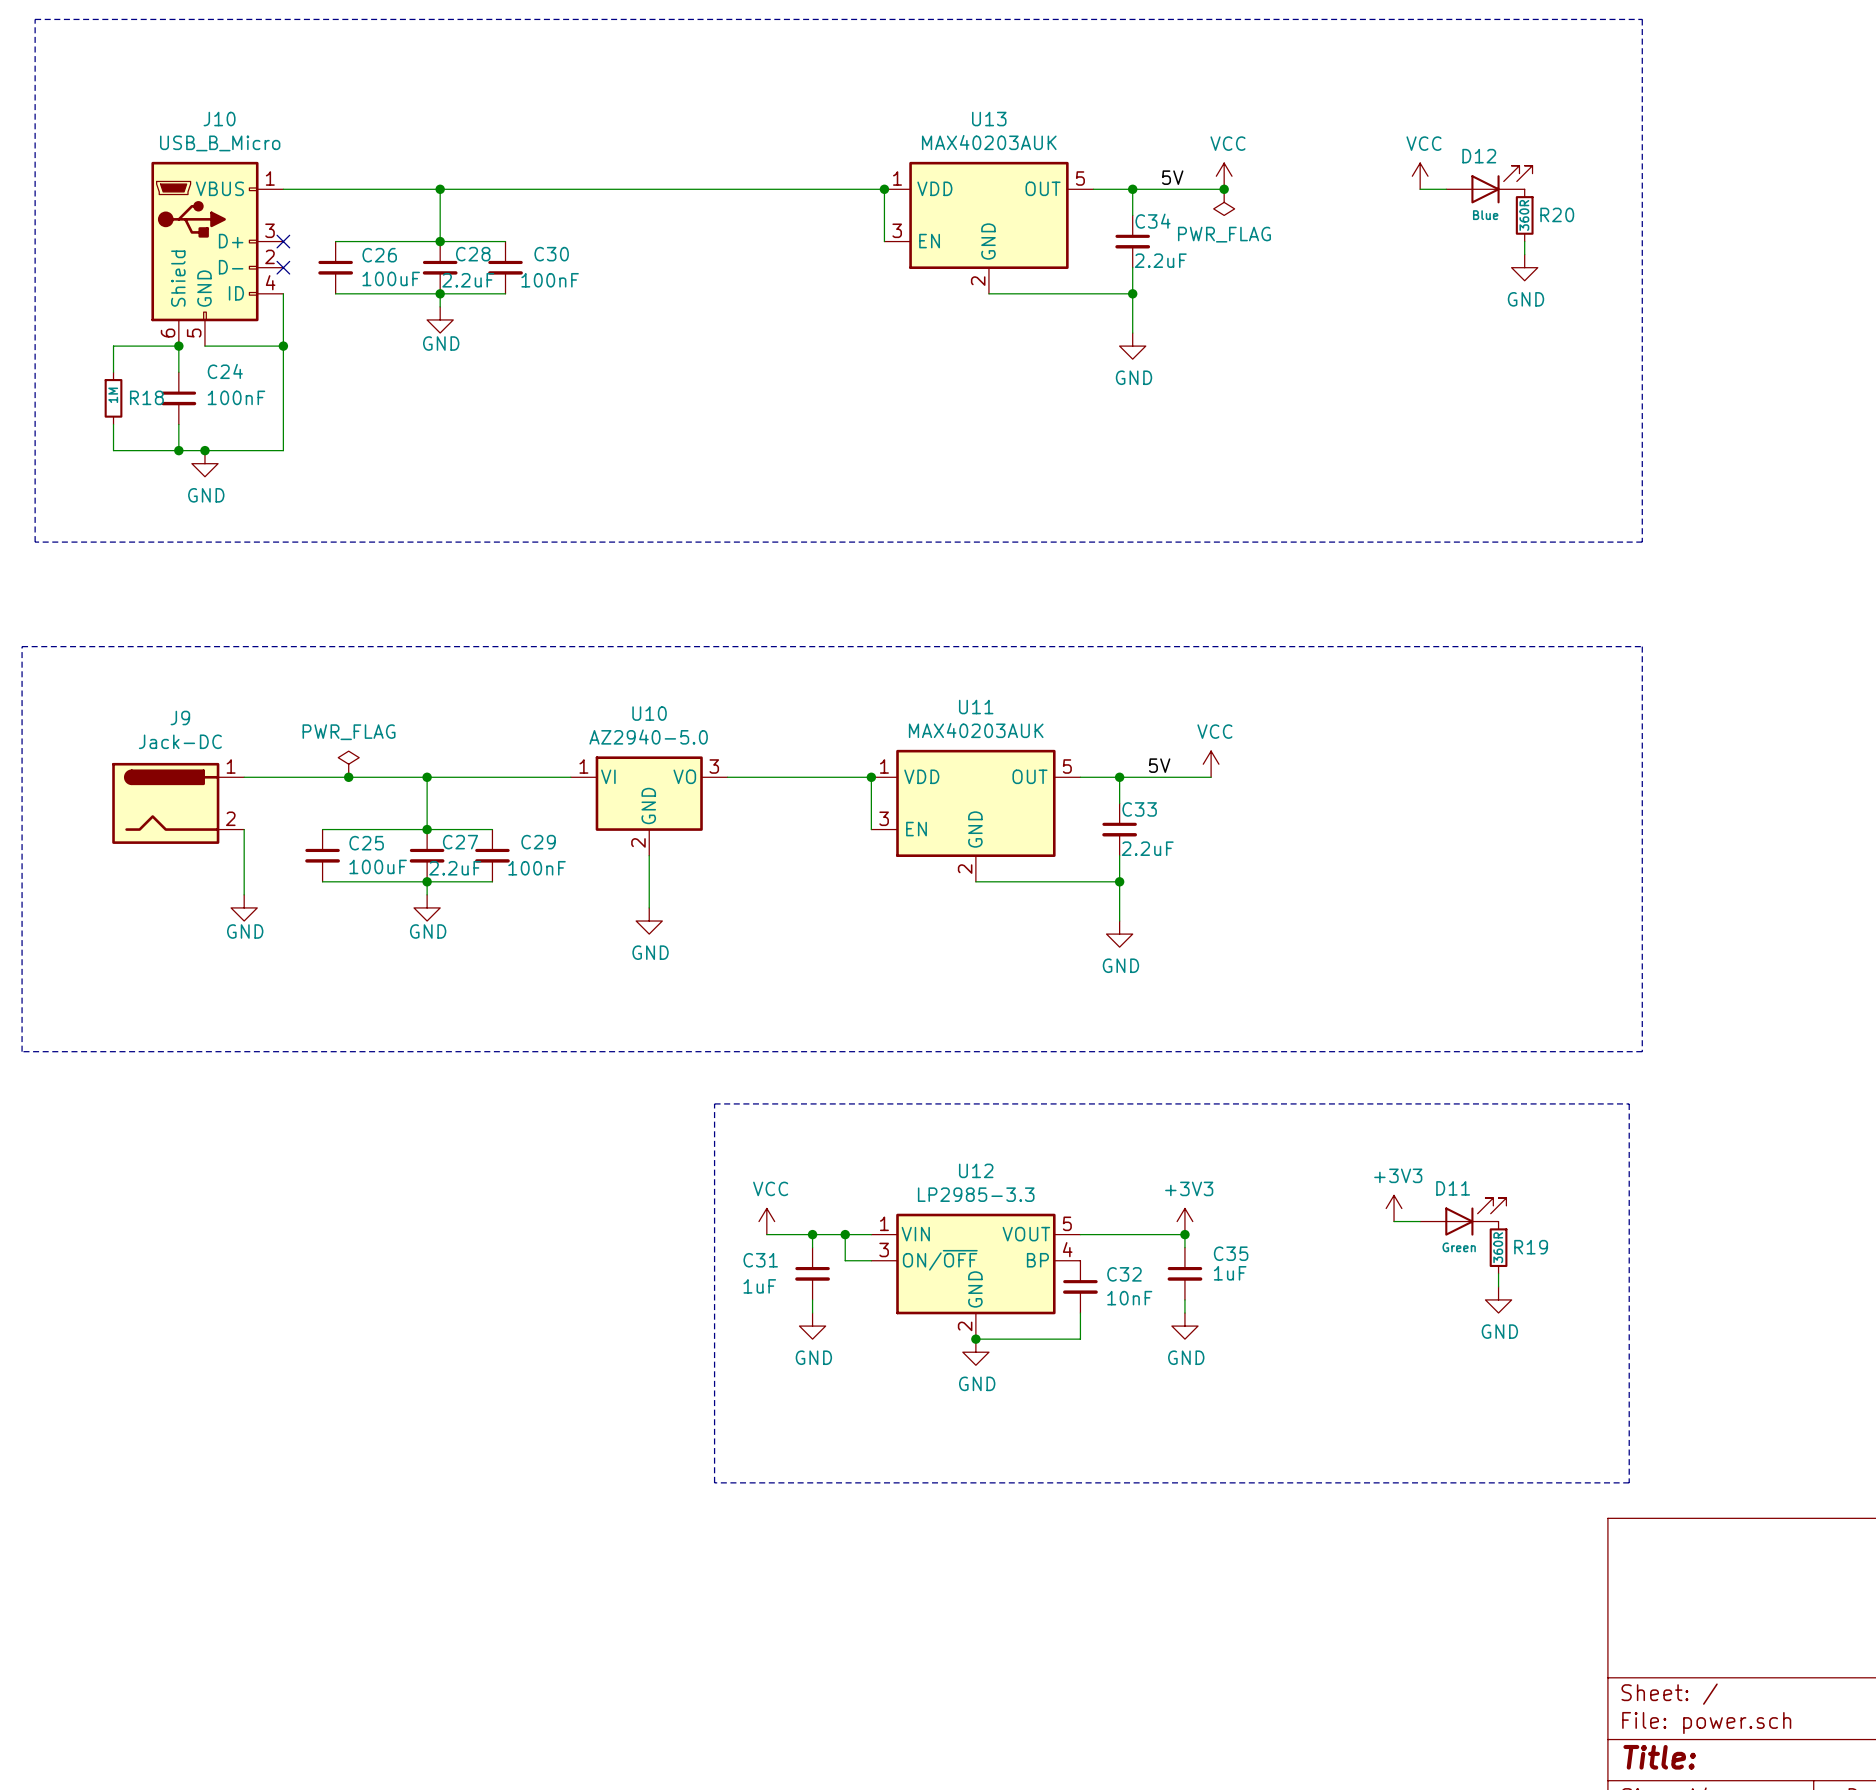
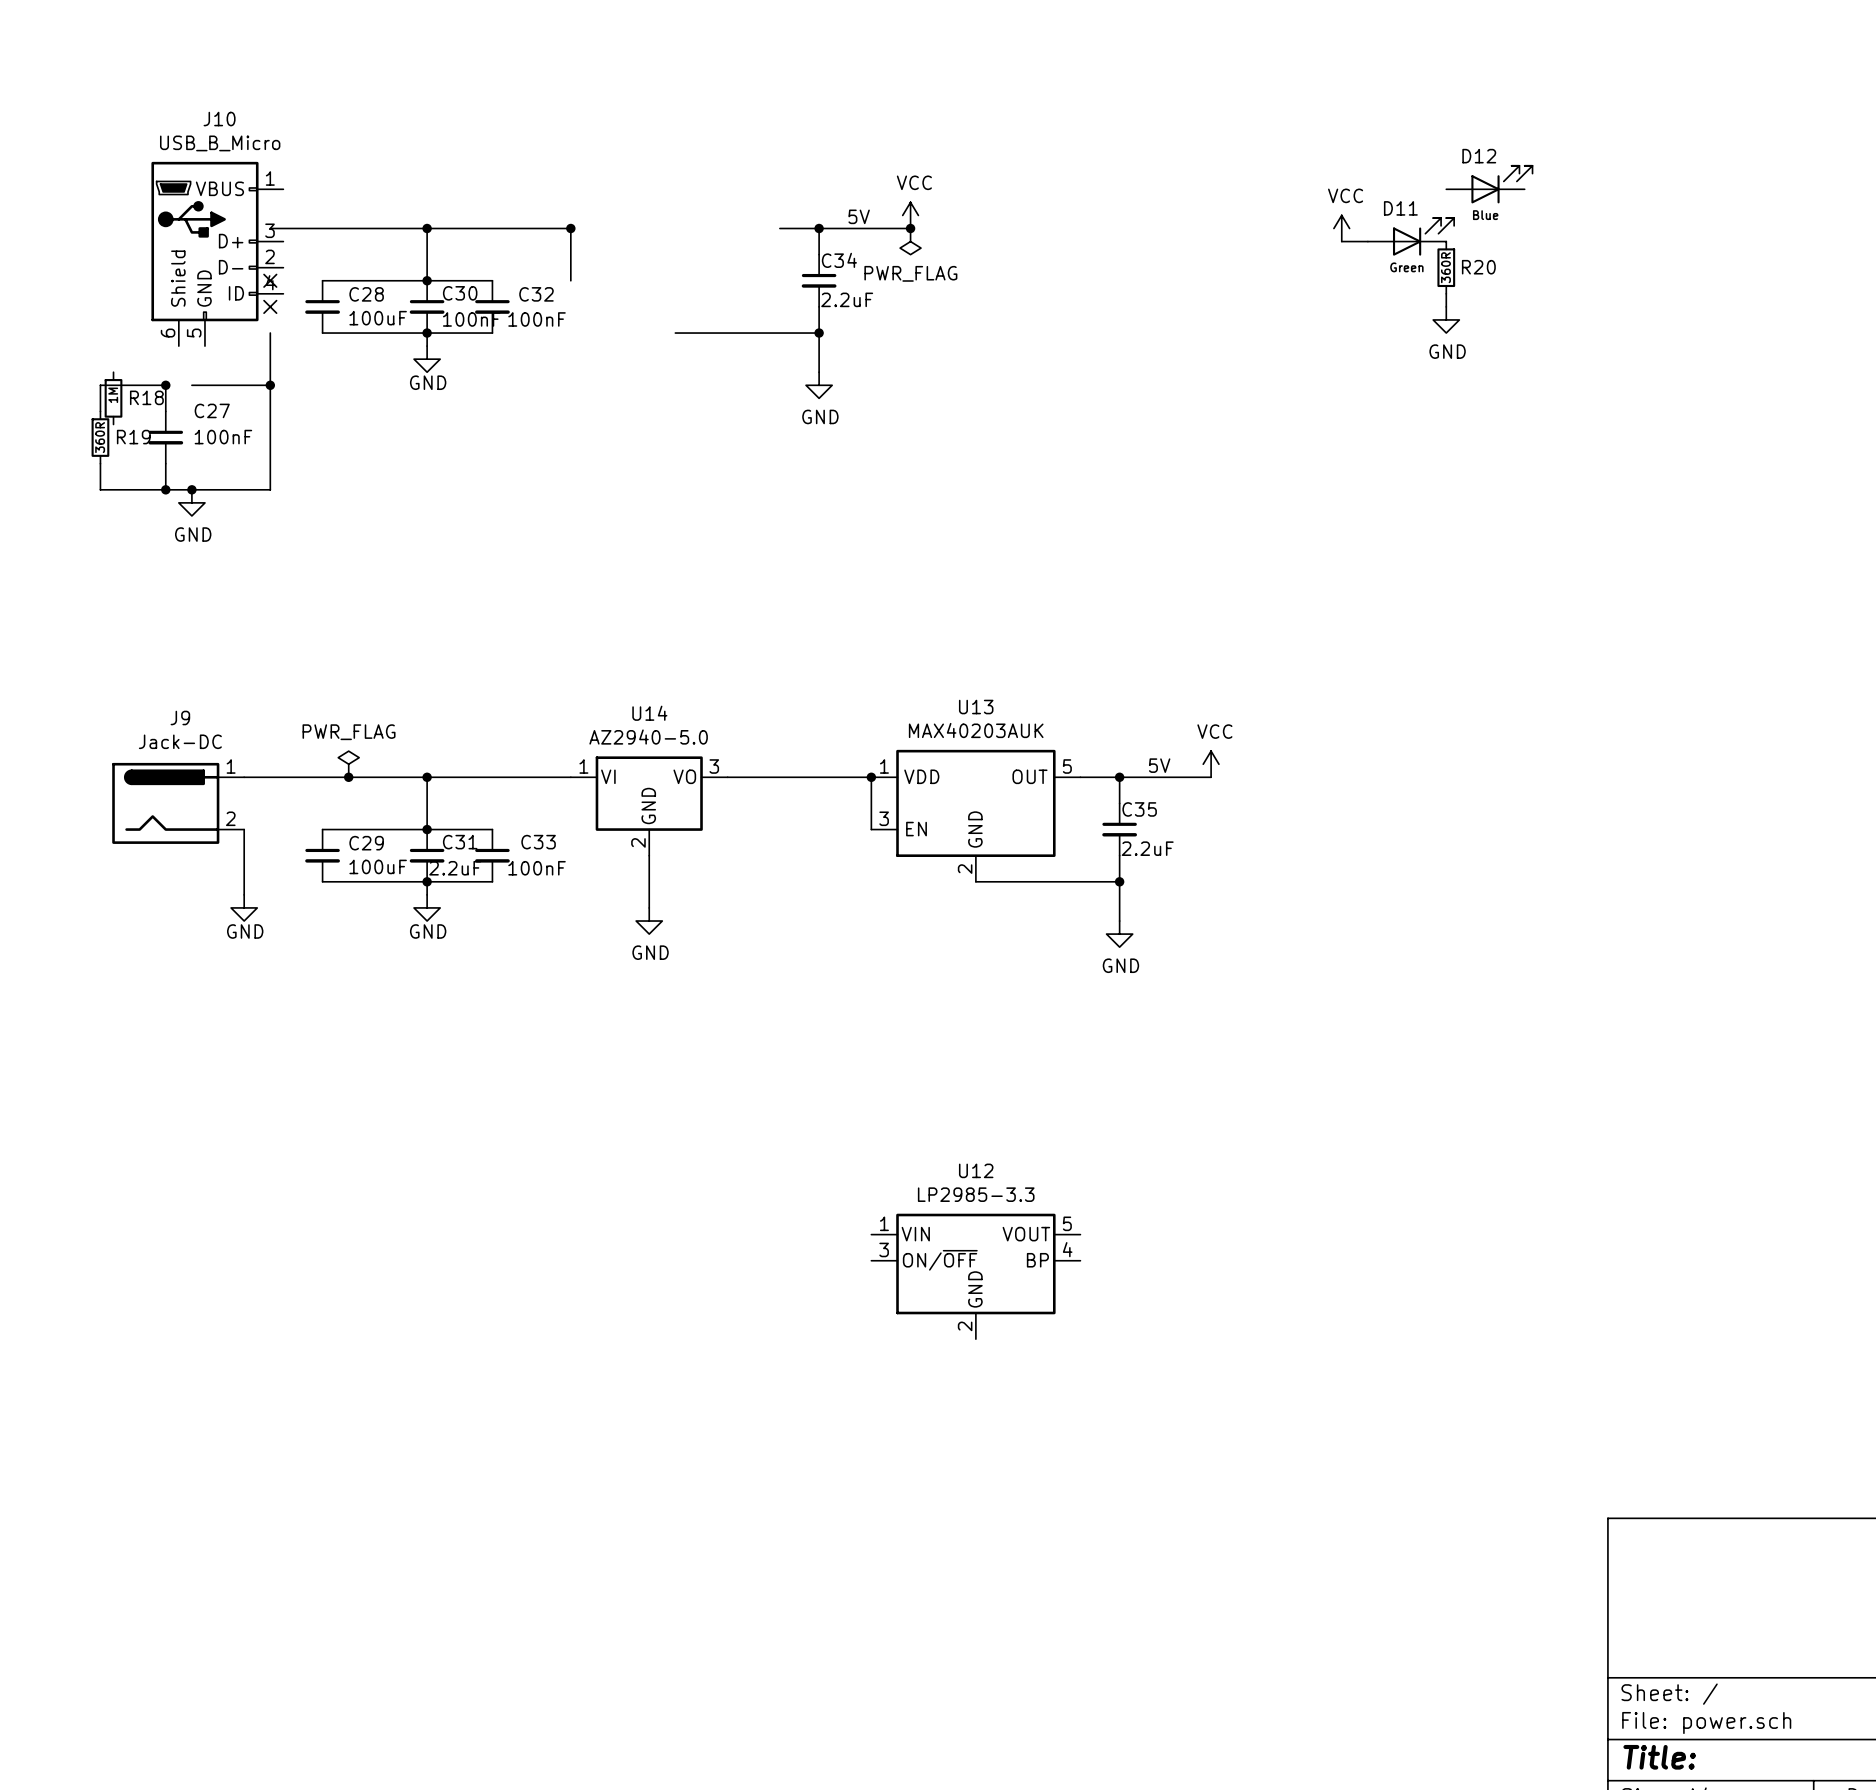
line: (35, 19) (35, 542) (1642, 542) (1642, 19) (35, 19) -> none
power symbol: VCC (1224, 176) -> none
power symbol: VCC (1420, 176) -> none
label: 5V (1172, 177) -> none
wire: (283, 189) (884, 189) (884, 241) -> none
wire: (440, 189) (440, 241) -> (427, 228) (427, 280)
junction: (440, 189) -> none
junction: (884, 189) -> none
wire: (1093, 189) (1224, 189) -> none
wire: (1132, 189) (1132, 215) -> none
junction: (1132, 189) -> none
junction: (1224, 189) -> none
wire: (1420, 189) (1446, 189) -> (1341, 241) (1367, 241)
power symbol: PWR_FLAG (1224, 202) -> none
power symbol: none -> VCC (910, 215)
R20 position: (1524, 215) -> (1446, 267)
label: none -> 5V (859, 216)
U13: MAX40203AUK (988, 227) -> none
wire: none -> (270, 228) (570, 228) (570, 280)
junction: none -> (570, 228)
wire: none -> (779, 228) (910, 228)
wire: none -> (819, 228) (819, 254)
junction: none -> (819, 228)
junction: none -> (910, 228)
power symbol: none -> VCC (1341, 228)
no-connect mark: (283, 241) -> none
wire: (335, 241) (505, 241) -> (322, 280) (492, 280)
junction position: (440, 241) -> (427, 228)
power symbol: none -> PWR_FLAG (910, 241)
C34 position: (1132, 241) -> (819, 280)
wire: (1524, 241) (1524, 254) -> (1446, 293) (1446, 306)
C28 name position: C28 (473, 254) -> C28 (366, 294)
C30 name position: C30 (551, 254) -> C30 (460, 293)
no-connect mark position: (283, 267) -> (270, 280)
C26: 100uF (335, 267) -> none
C28 position: (440, 267) -> (322, 306)
C30 position: (505, 267) -> (427, 306)
wire: (1132, 267) (1132, 333) -> none
power symbol position: GND (1524, 267) -> GND (1446, 319)
C28 value: 2.2uF (468, 280) -> 100uF (378, 318)
wire: (283, 293) (283, 450) (113, 450) (113, 424) -> (270, 333) (270, 489) (100, 489) (100, 463)
wire: (335, 293) (505, 293) -> (322, 333) (492, 333)
wire: (440, 293) (440, 306) -> (427, 333) (427, 346)
junction position: (440, 293) -> (427, 280)
wire: (988, 293) (1132, 293) -> none
junction: (1132, 293) -> none
no-connect mark: none -> (270, 306)
wire: none -> (819, 306) (819, 372)
power symbol position: GND (440, 319) -> GND (427, 359)
junction: none -> (427, 333)
wire: none -> (675, 333) (819, 333)
junction: none -> (819, 333)
junction: (178, 346) -> none
wire: (204, 346) (283, 346) -> (191, 385) (270, 385)
junction position: (283, 346) -> (270, 385)
power symbol: GND (1132, 346) -> none
wire: (113, 372) (113, 346) (178, 346) (178, 372) -> (100, 411) (100, 385) (165, 385) (165, 411)
junction: none -> (165, 385)
power symbol: none -> GND (819, 385)
C24: 100nF (178, 398) -> none
wire: (178, 424) (178, 450) -> (165, 463) (165, 489)
C27: none -> 100nF (165, 437)
junction: (178, 450) -> none
junction: (204, 450) -> none
power symbol position: GND (204, 463) -> GND (191, 502)
junction: none -> (165, 489)
junction: none -> (191, 489)
line: (22, 646) (22, 1051) (1642, 1051) (1642, 646) (22, 646) -> none
U11 name: U11 (976, 707) -> U13 (976, 707)
U10 name: U10 (649, 713) -> U14 (649, 713)
C33 name: C33 (1139, 809) -> C35 (1139, 809)
C27 name: C27 (460, 842) -> C31 (460, 842)
C29 name: C29 (538, 842) -> C33 (538, 842)
C25 name: C25 (366, 843) -> C29 (366, 843)
line: (714, 1103) (1629, 1103) (1629, 1482) (714, 1482) (714, 1103) -> none
power symbol: +3V3 (1394, 1208) -> none
D11 position: (1463, 1216) -> (1411, 236)
power symbol: VCC (766, 1221) -> none
power symbol: +3V3 (1184, 1221) -> none
wire: (1394, 1221) (1420, 1221) -> none
wire: (766, 1234) (871, 1234) -> none
wire: (812, 1234) (812, 1247) -> none
junction: (812, 1234) -> none
wire: (845, 1234) (845, 1260) (871, 1260) -> none
junction: (845, 1234) -> none
wire: (1080, 1234) (1184, 1234) (1184, 1247) -> none
junction: (1184, 1234) -> none
R19 position: (1498, 1247) -> (100, 437)
R19 name position: R19 (1531, 1247) -> R19 (133, 437)
C31: 1uF (812, 1273) -> none
C35: 1uF (1184, 1273) -> none
wire: (1498, 1273) (1498, 1286) -> none
C32 position: (1080, 1286) -> (492, 306)
C32 value: 10nF (1129, 1298) -> 100nF (537, 319)
wire: (812, 1299) (812, 1313) -> none
wire: (1184, 1299) (1184, 1313) -> none
power symbol: GND (1498, 1299) -> none
wire: (1080, 1313) (1080, 1339) (975, 1339) -> none
power symbol: GND (812, 1326) -> none
power symbol: GND (1184, 1326) -> none
junction: (975, 1339) -> none
power symbol: GND (975, 1352) -> none

